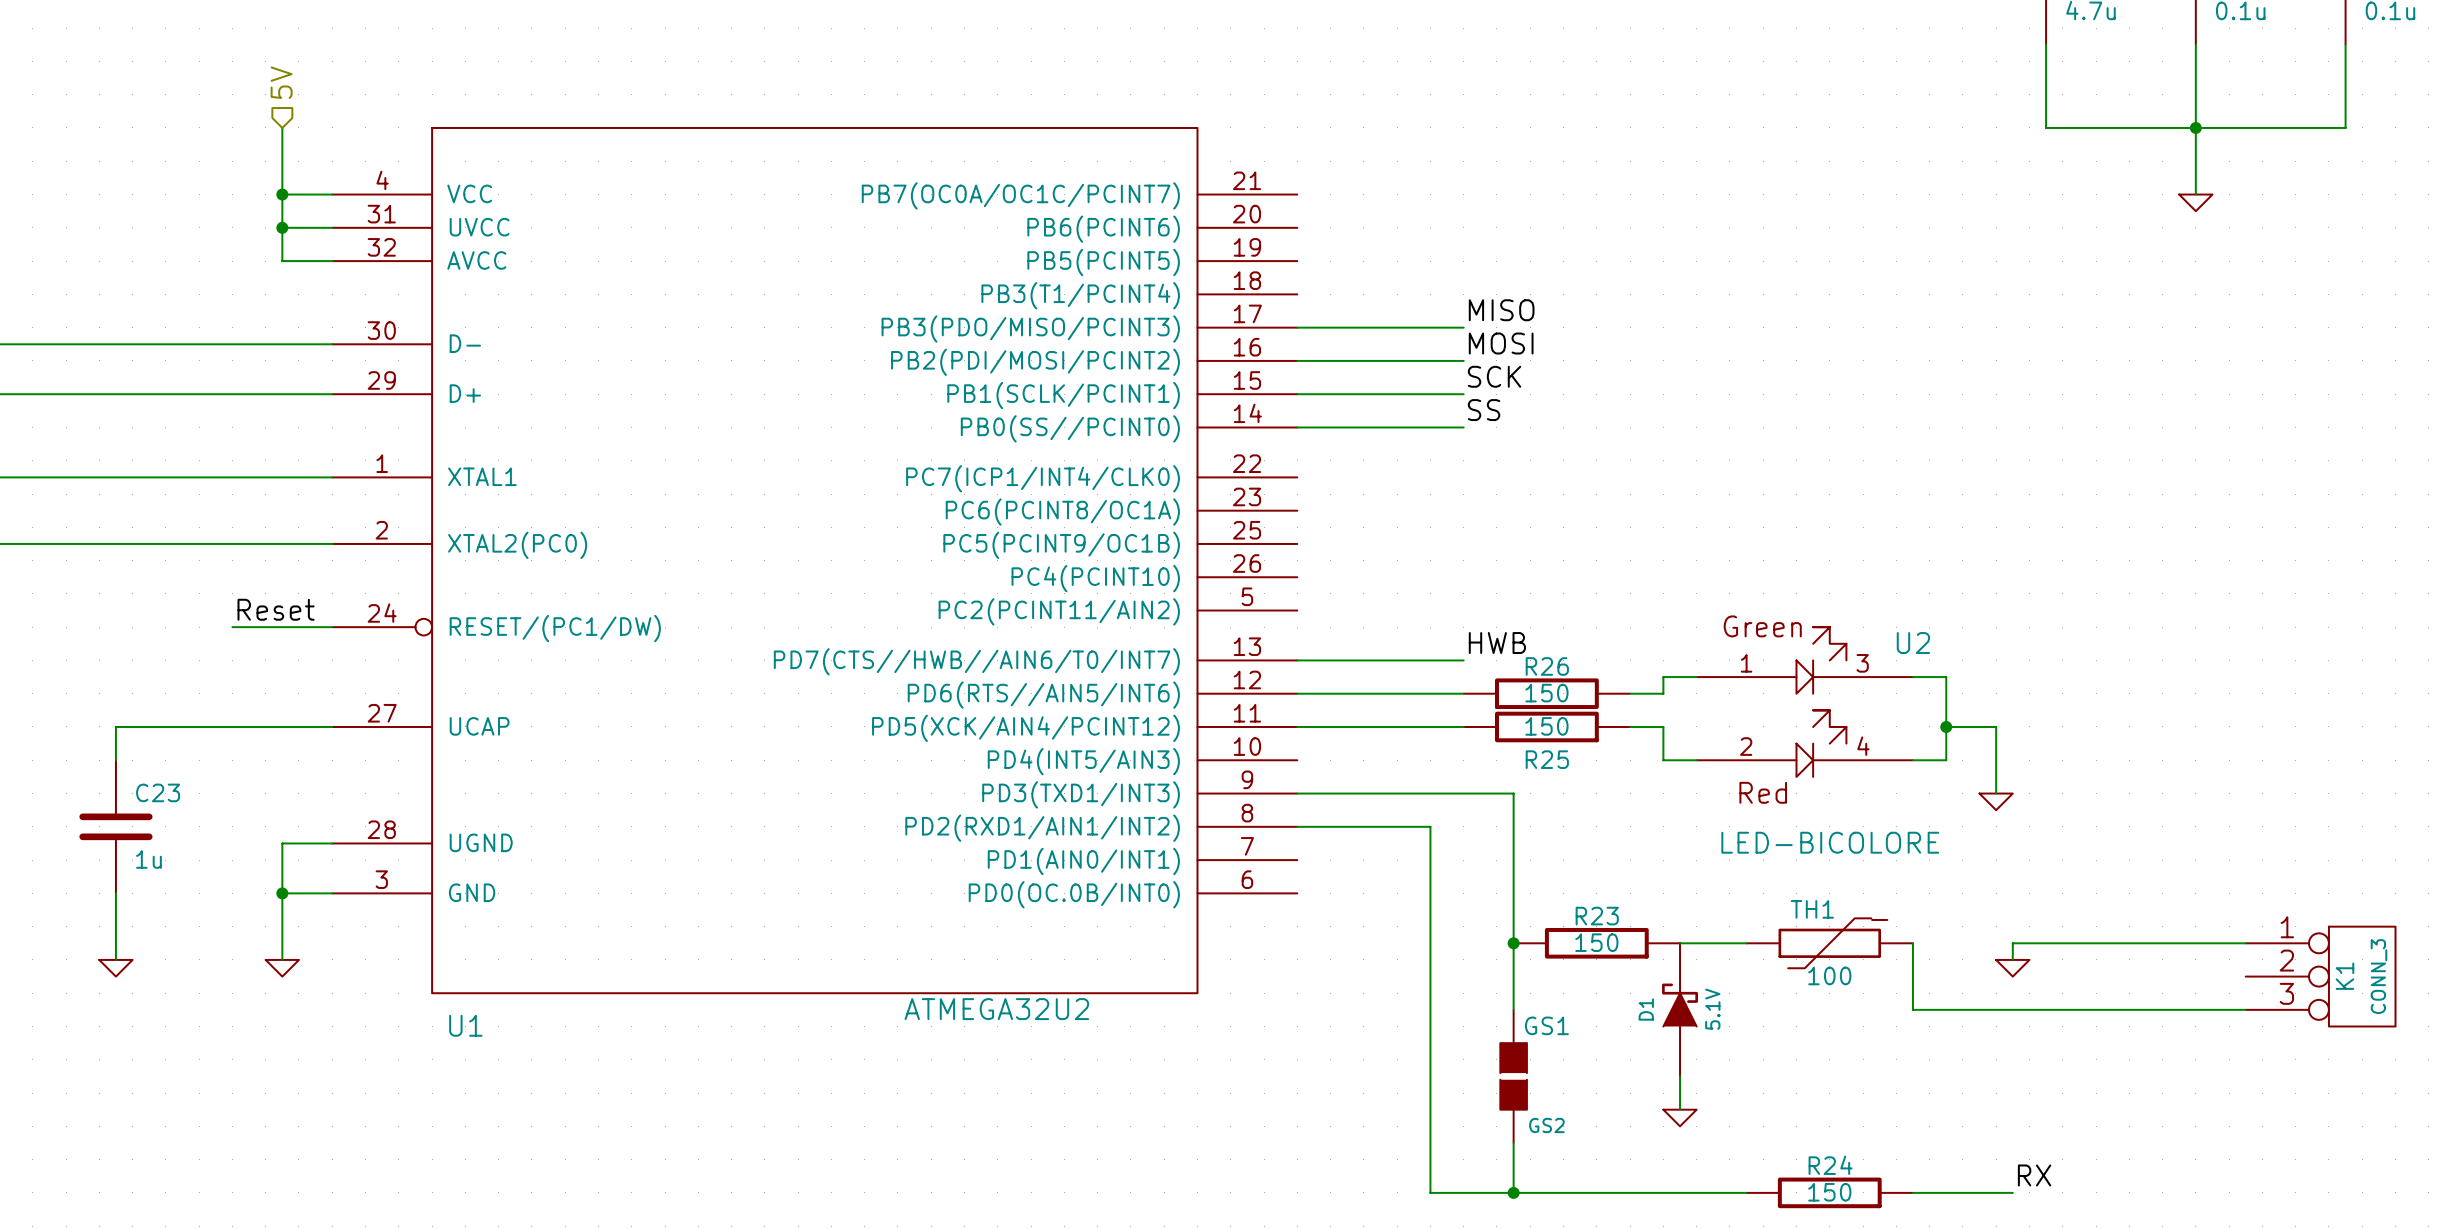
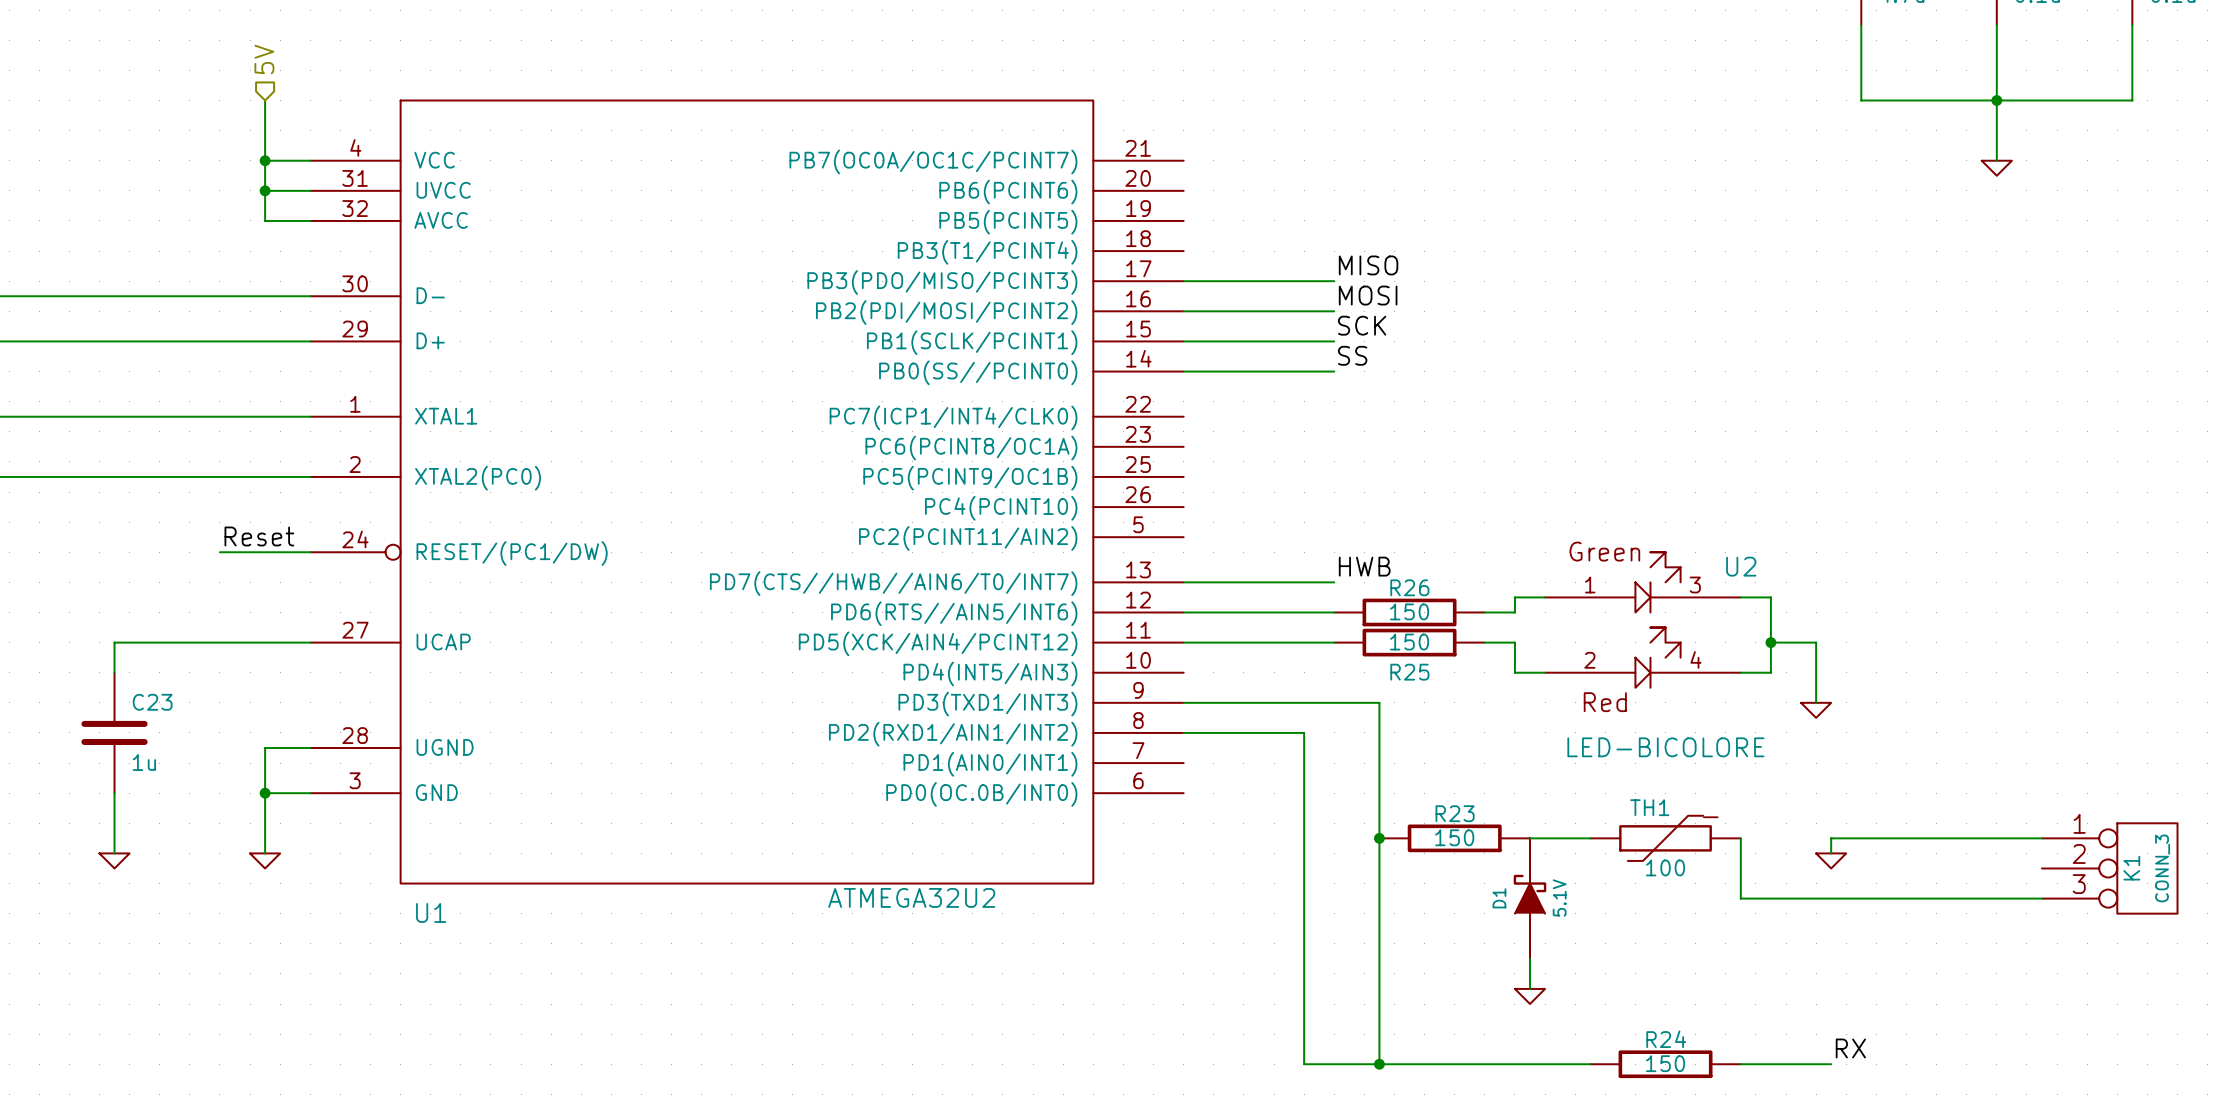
GS1: GS2 (1513, 1076) -> none

